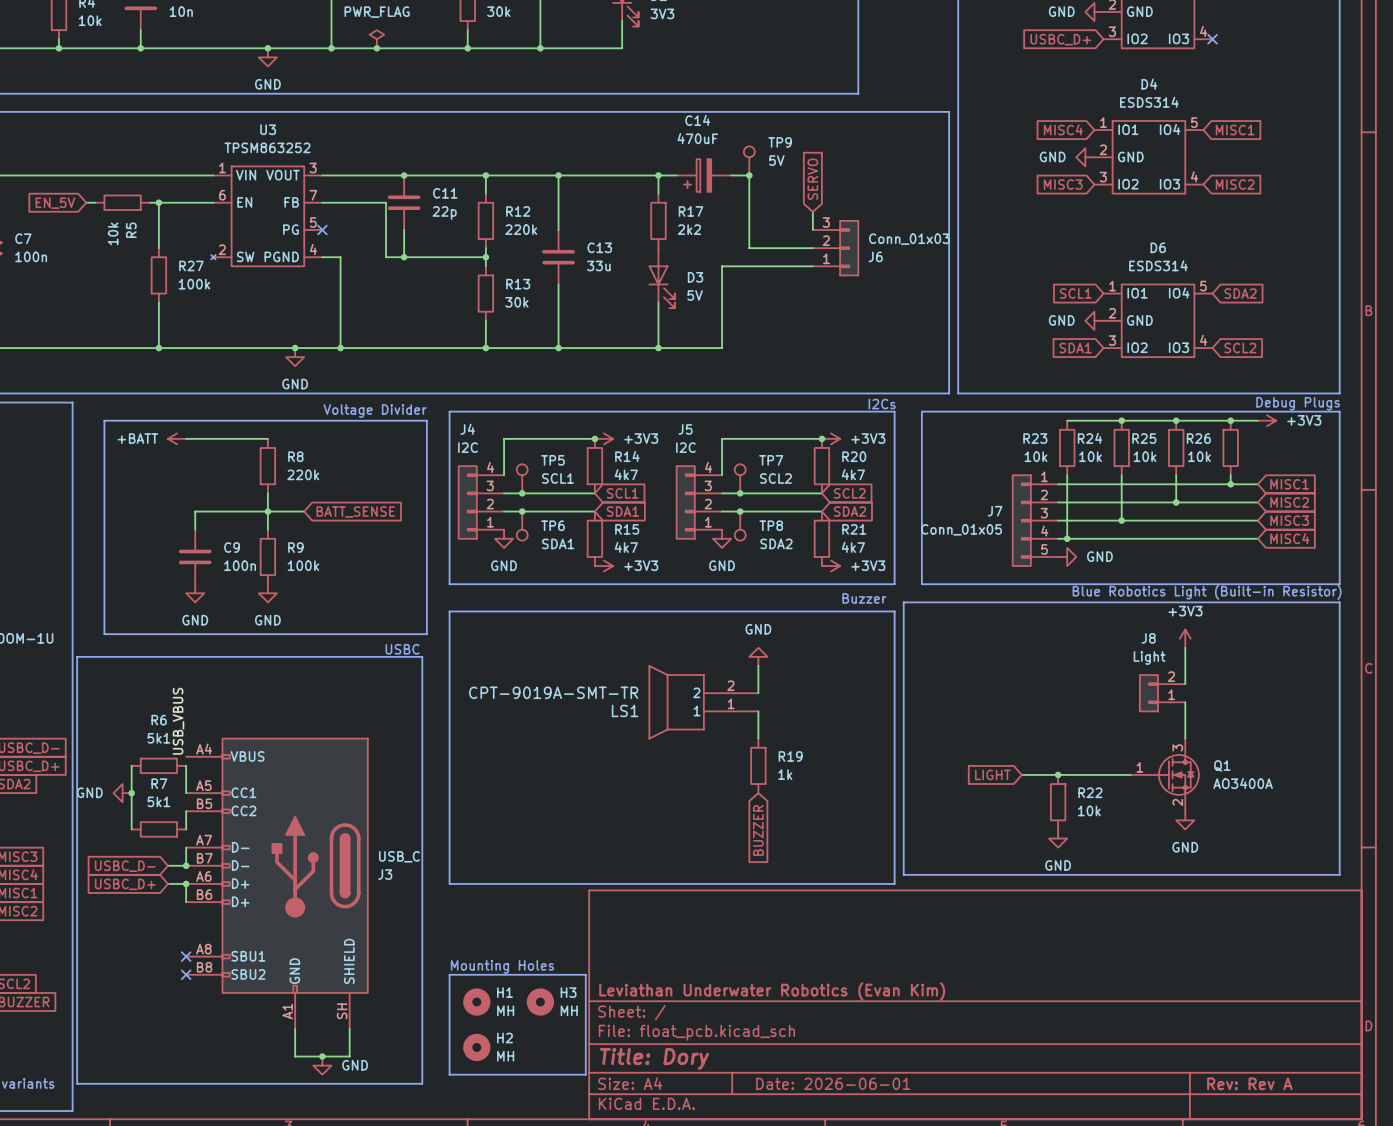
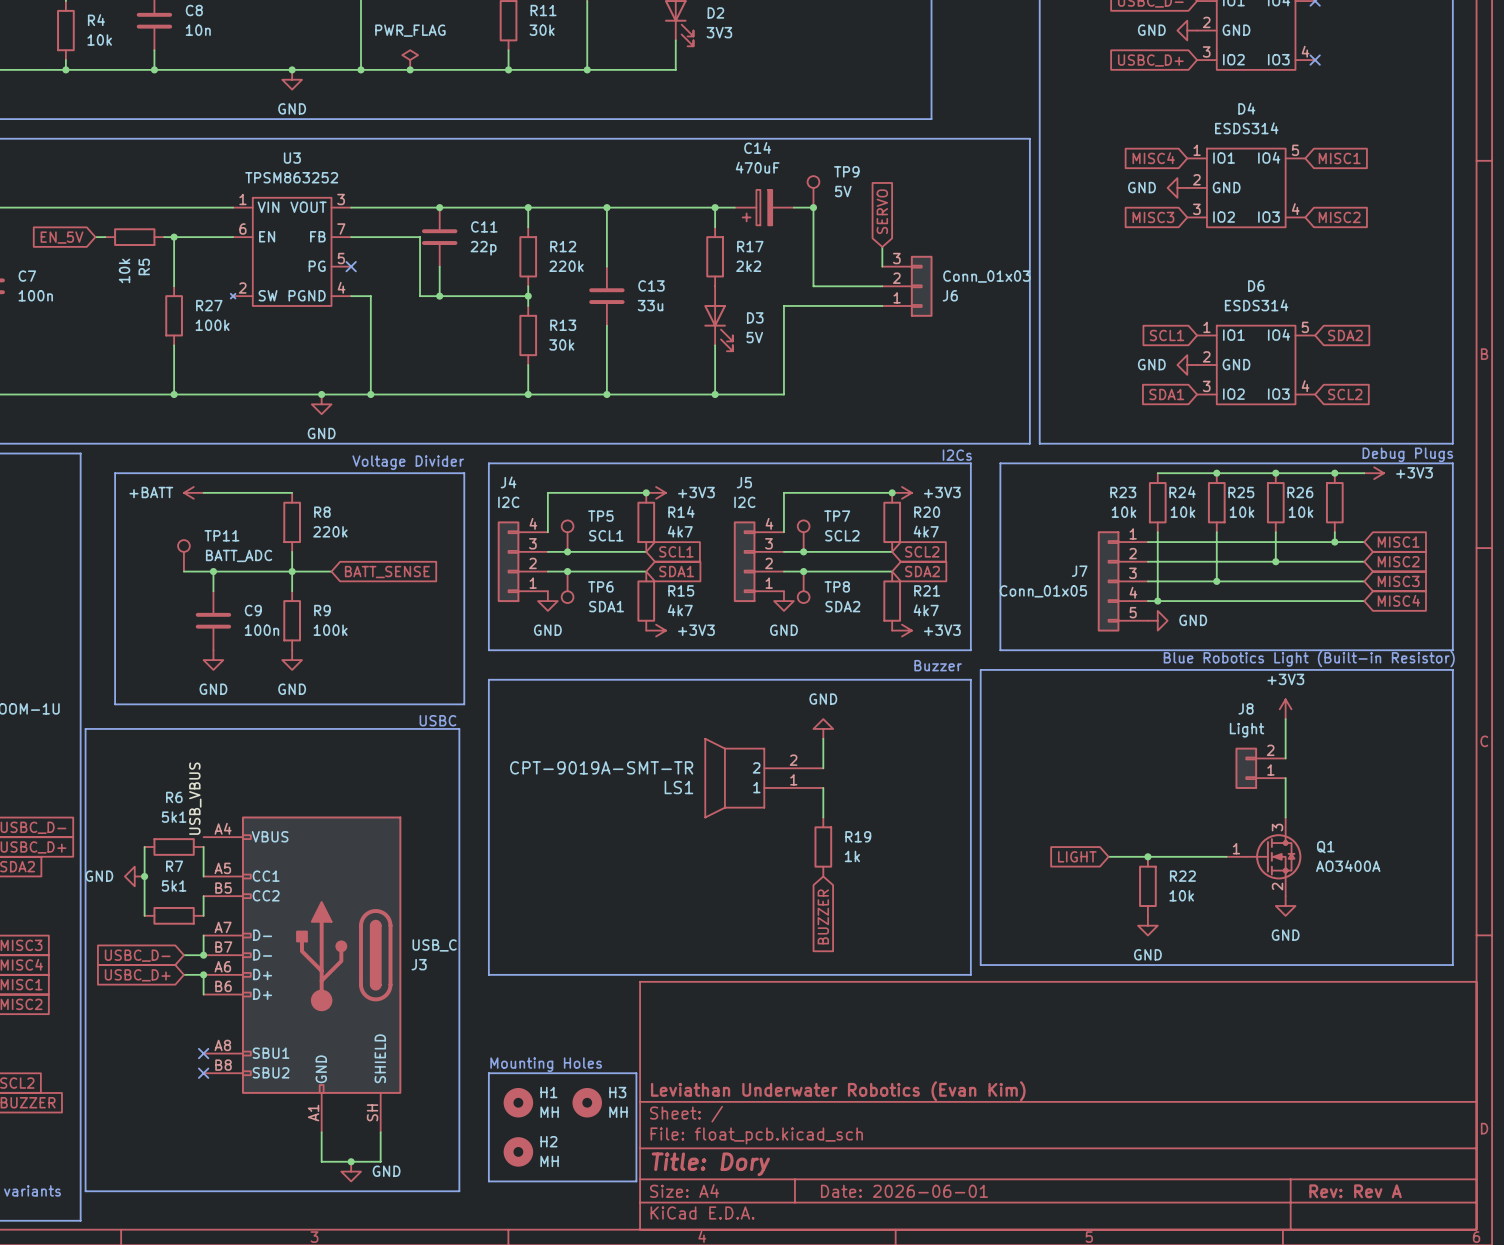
TP11: none -> BATT_ADC (183, 555)
wire: none -> (183, 571) (213, 571)
junction: none -> (213, 571)

